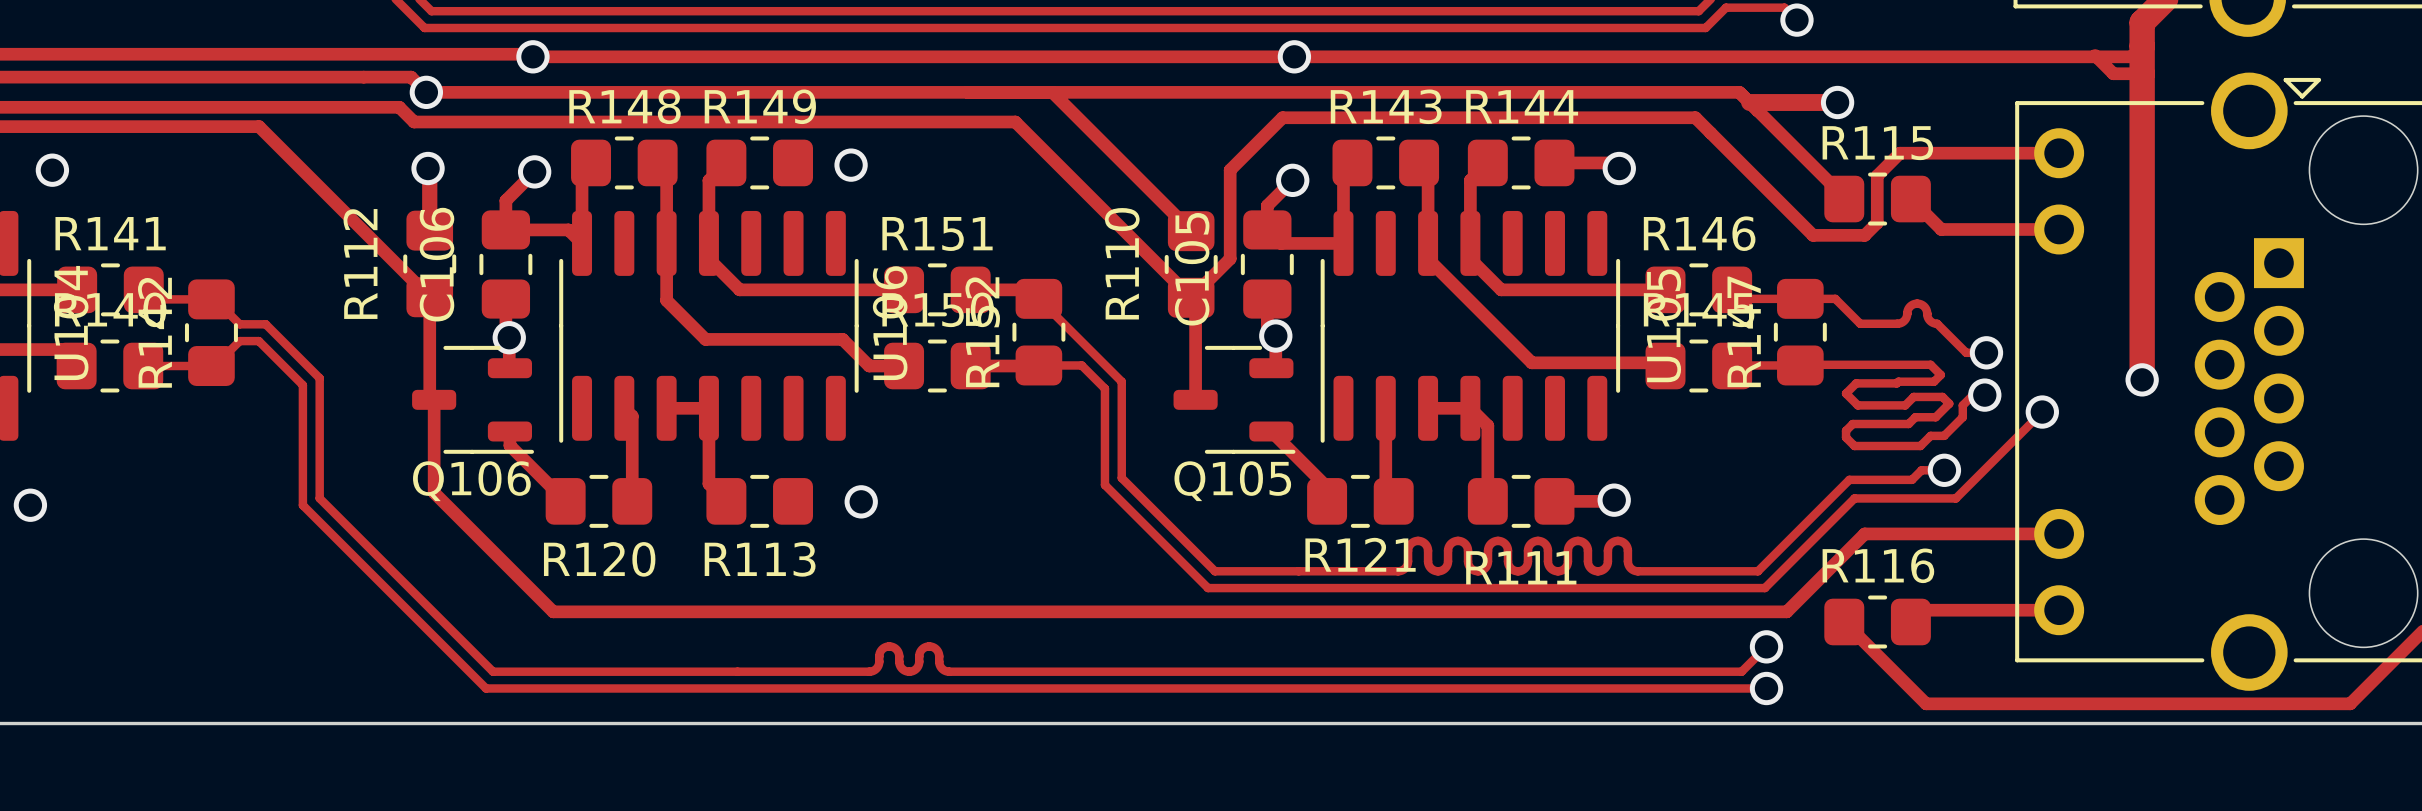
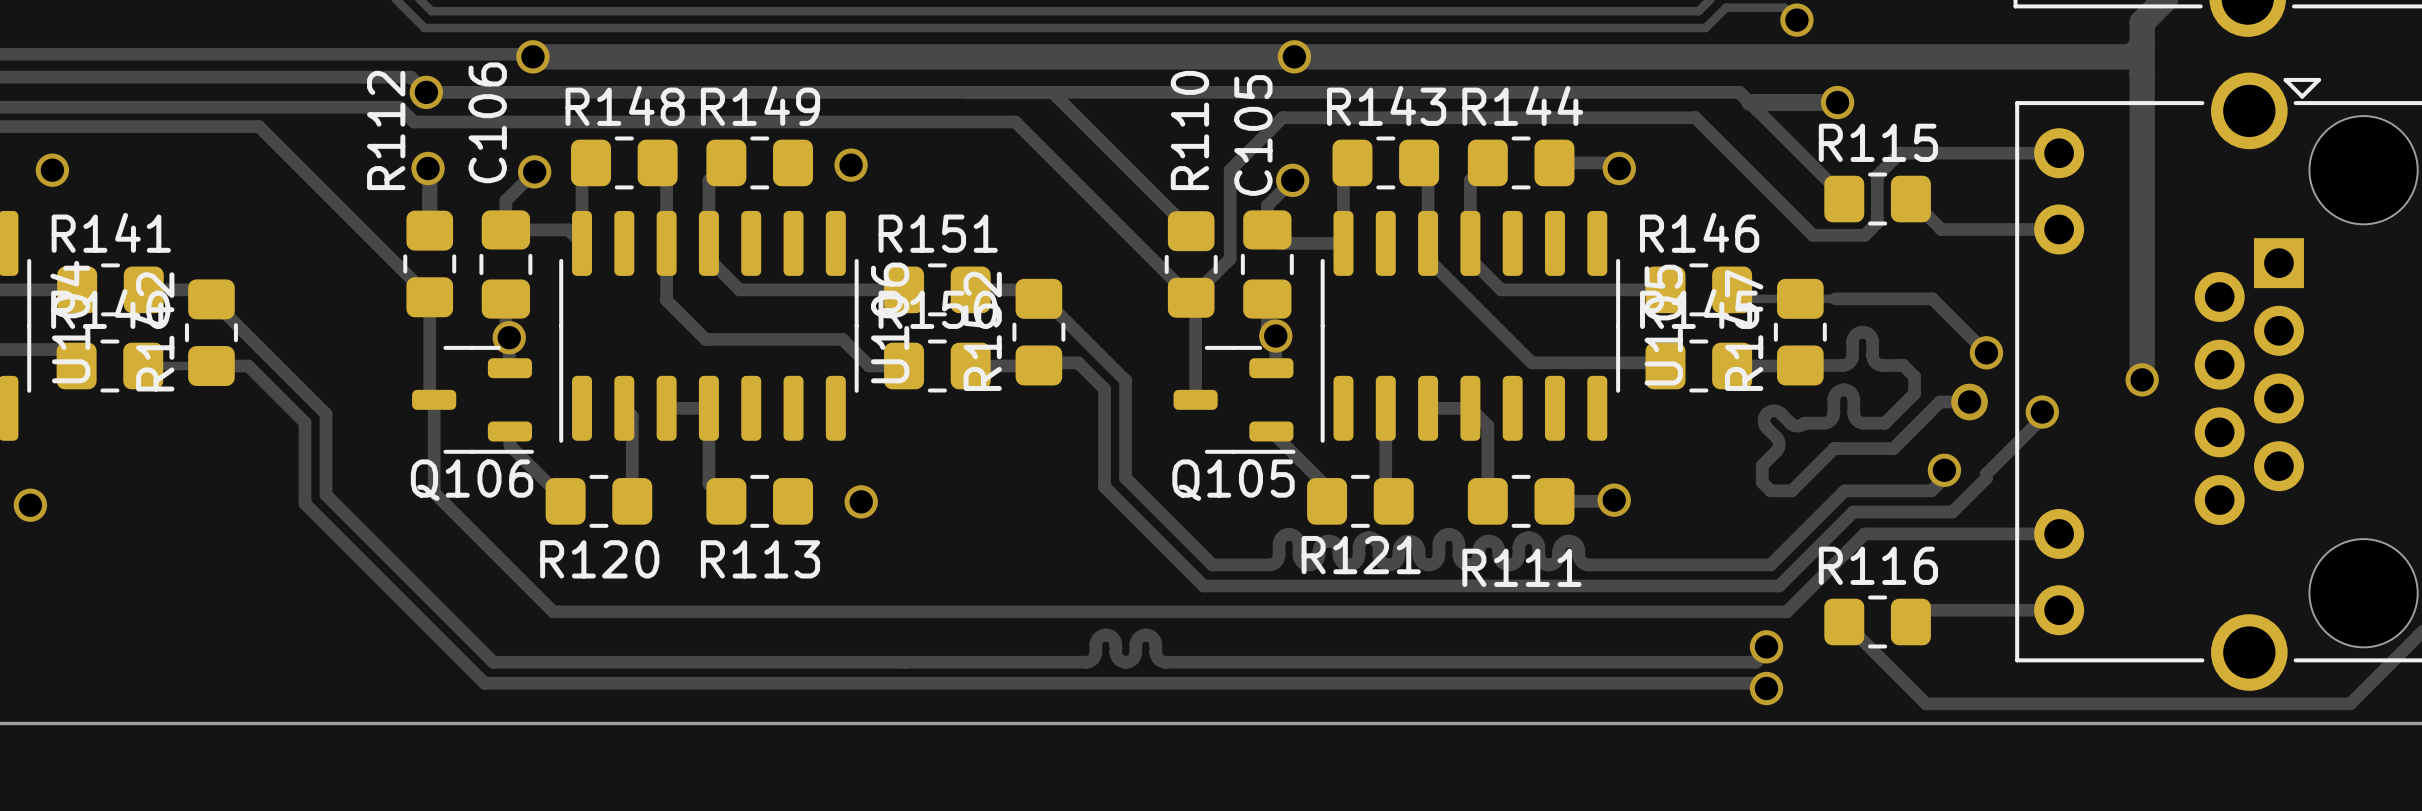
track width: thin (2142, 46) (2131, 56) (532, 56) -> thick (2142, 46) (2131, 56) (532, 56)
track: (2095, 55) (2113, 73) (2142, 73) -> none
R112 name position: R112 (360, 263) -> R112 (386, 130)
R110 name position: R110 (1122, 263) -> R110 (1189, 130)
C106 name position: C106 (436, 264) -> C106 (487, 122)
C105 name position: C105 (1192, 269) -> C105 (1253, 135)
track: (143, 289) (153, 299) (214, 299) (239, 324) (265, 324) (319, 378) (319, 498) (493, 671) (869, 671) (877, 666) (881, 650) (889, 646) (897, 650) (900, 666) (909, 671) (917, 666) (921, 650) (929, 646) (937, 650) (940, 666) (949, 671) (1741, 671) (1766, 646) -> (143, 289) (201, 289) (326, 413) (326, 494) (493, 662) (1085, 662) (1093, 658) (1097, 639) (1105, 634) (1113, 638) (1117, 657) (1125, 662) (1134, 657) (1137, 638) (1145, 634) (1153, 638) (1157, 657) (1165, 662) (1756, 662) (1766, 651)
track: (1038, 298) (1121, 381) (1121, 478) (1214, 571) (1399, 571) (1407, 565) (1409, 545) (1418, 540) (1424, 542) (1427, 547) (1430, 567) (1439, 571) (1447, 565) (1449, 545) (1458, 540) (1466, 545) (1468, 565) (1476, 571) (1485, 567) (1488, 547) (1491, 542) (1498, 540) (1506, 545) (1508, 565) (1515, 570) (1520, 570) (1525, 567) (1528, 547) (1531, 542) (1537, 540) (1546, 545) (1548, 563) (1554, 570) (1560, 570) (1565, 567) (1568, 547) (1571, 542) (1577, 540) (1582, 542) (1587, 547) (1590, 567) (1595, 570) (1600, 570) (1607, 565) (1609, 545) (1617, 540) (1626, 545) (1628, 565) (1635, 570) (1757, 571) (1849, 479) (1912, 479) (1921, 470) (1944, 470) -> (1038, 298) (1043, 298) (1125, 380) (1125, 478) (1212, 564) (1272, 564) (1278, 557) (1280, 539) (1289, 534) (1297, 539) (1299, 558) (1304, 563) (1309, 564) (1316, 561) (1320, 546) (1329, 541) (1337, 546) (1341, 562) (1347, 564) (1352, 564) (1358, 558) (1360, 542) (1368, 537) (1377, 542) (1379, 558) (1385, 564) (1390, 564) (1396, 562) (1400, 546) (1408, 541) (1417, 546) (1421, 562) (1431, 564) (1438, 558) (1440, 539) (1448, 534) (1457, 539) (1459, 558) (1467, 564) (1475, 562) (1480, 546) (1488, 541) (1497, 546) (1501, 562) (1507, 564) (1512, 564) (1518, 558) (1520, 542) (1528, 537) (1536, 541) (1539, 558) (1547, 564) (1555, 562) (1560, 546) (1568, 541) (1576, 544) (1580, 559) (1587, 564) (1770, 564) (1844, 490) (1931, 490) (1945, 474)
track: (1835, 298) (1860, 323) (1899, 323) (1905, 318) (1910, 306) (1915, 303) (1921, 304) (1925, 308) (1930, 320) (1937, 323) (1966, 352) (1986, 352) -> (1835, 298) (1932, 298) (1986, 352)
track: (214, 366) (239, 341) (258, 341) (302, 385) (302, 505) (486, 688) (1766, 688) -> (214, 366) (248, 366) (305, 422) (305, 503) (484, 683) (1756, 683) (1766, 693)
track: (1038, 366) (1081, 365) (1104, 388) (1104, 485) (1208, 588) (1764, 588) (1854, 498) (1955, 498) (2042, 412) -> (1038, 365) (1041, 362) (1078, 362) (1104, 389) (1104, 486) (1203, 585) (1779, 585) (1853, 512) (1952, 512) (1986, 478) (1986, 473) (2045, 414)
track: (1732, 366) (1930, 364) (1940, 374) (1934, 381) (1856, 383) (1846, 393) (1857, 405) (1905, 405) (1913, 396) (1942, 396) (1949, 403) (1935, 417) (1915, 417) (1908, 424) (1852, 424) (1846, 430) (1846, 437) (1854, 446) (1920, 446) (1930, 435) (1944, 435) (1962, 417) (1962, 405) (1973, 395) (1984, 395) -> (1732, 366) (1845, 365) (1852, 358) (1853, 337) (1862, 332) (1868, 334) (1871, 338) (1872, 356) (1876, 363) (1881, 365) (1903, 365) (1914, 376) (1914, 393) (1884, 423) (1862, 423) (1857, 421) (1853, 414) (1853, 396) (1845, 389) (1839, 390) (1835, 394) (1833, 415) (1826, 422) (1804, 423) (1796, 426) (1778, 411) (1772, 410) (1767, 413) (1764, 418) (1764, 424) (1777, 438) (1779, 444) (1777, 450) (1762, 465) (1762, 482) (1770, 490) (1791, 490) (1834, 448) (1893, 448) (1939, 402) (1969, 402)
via position: (1984, 395) -> (1969, 402)

